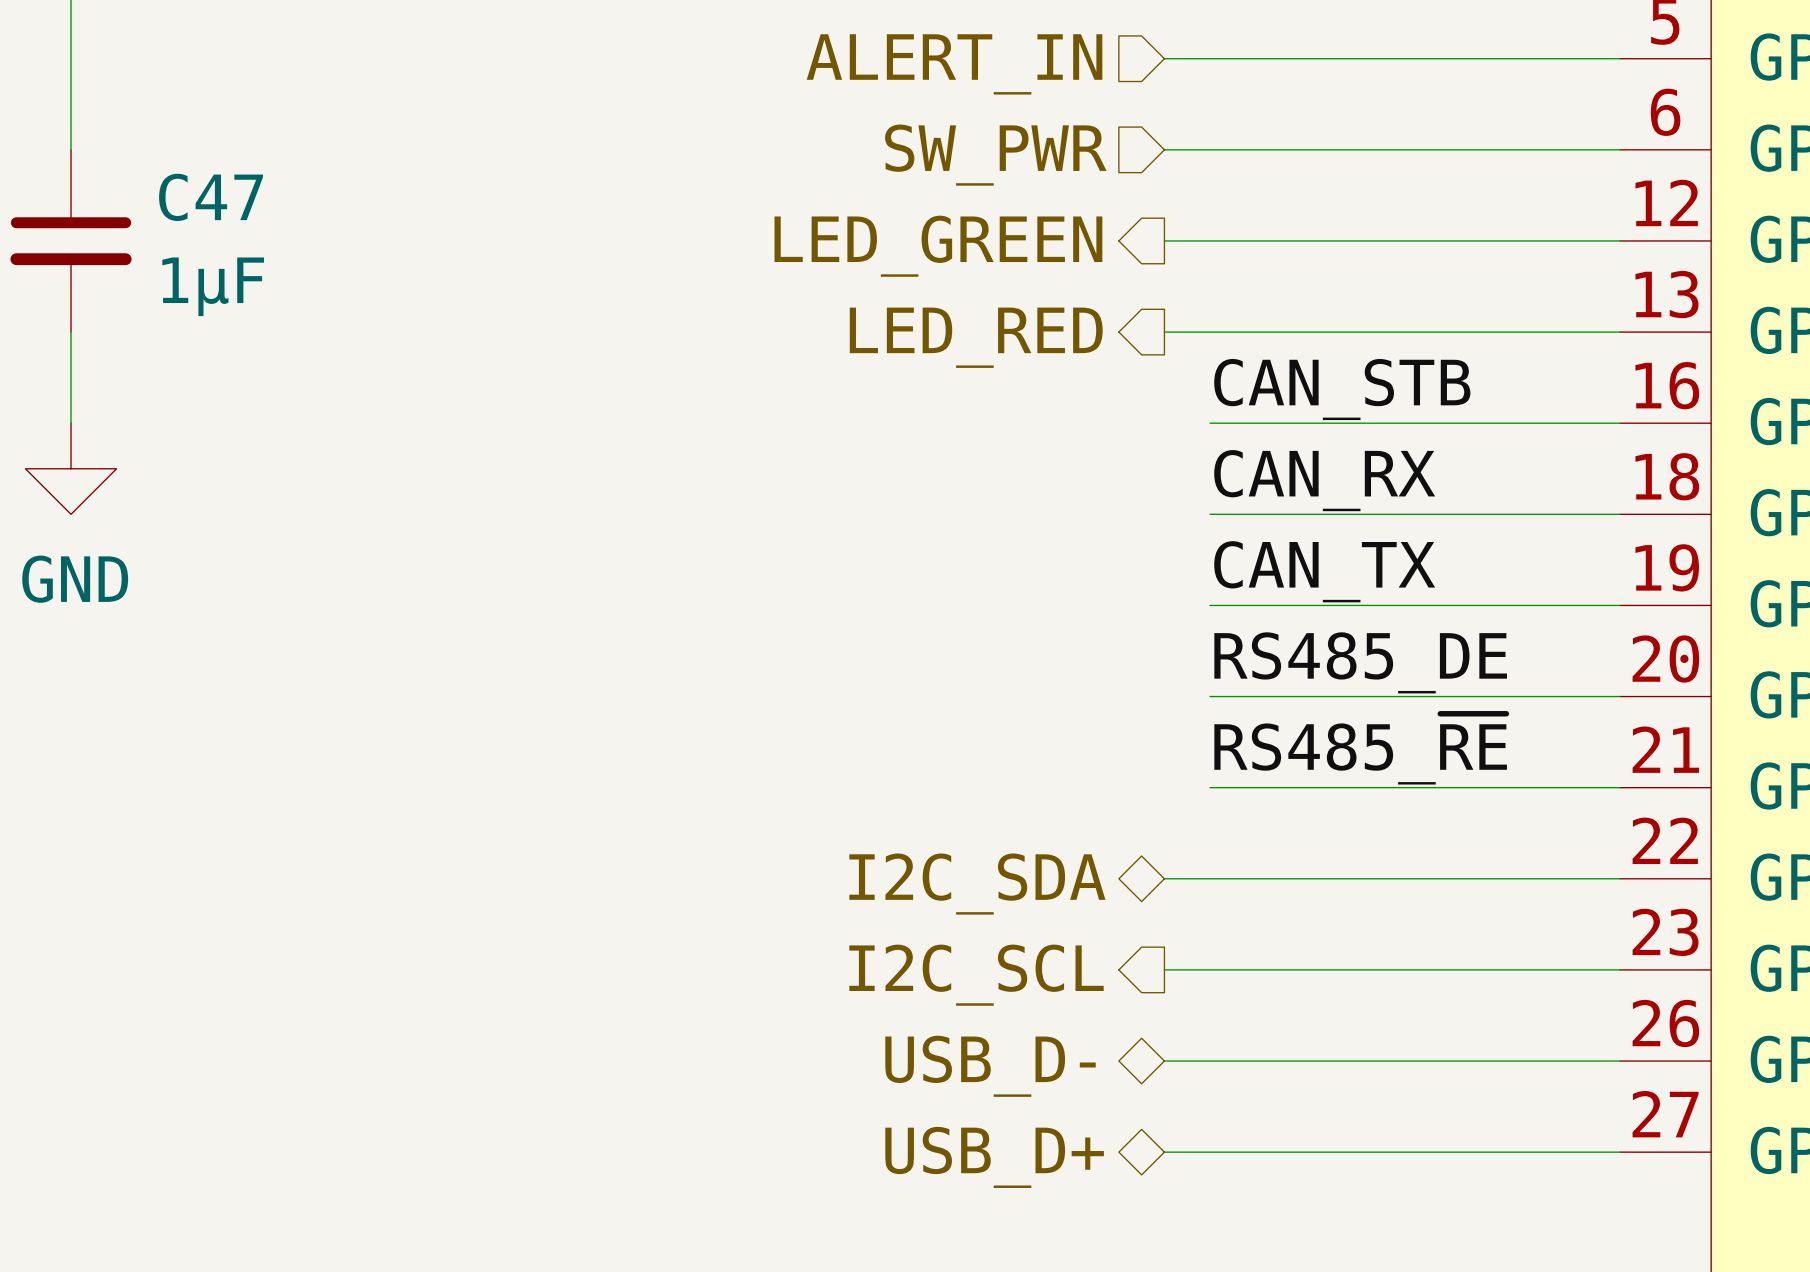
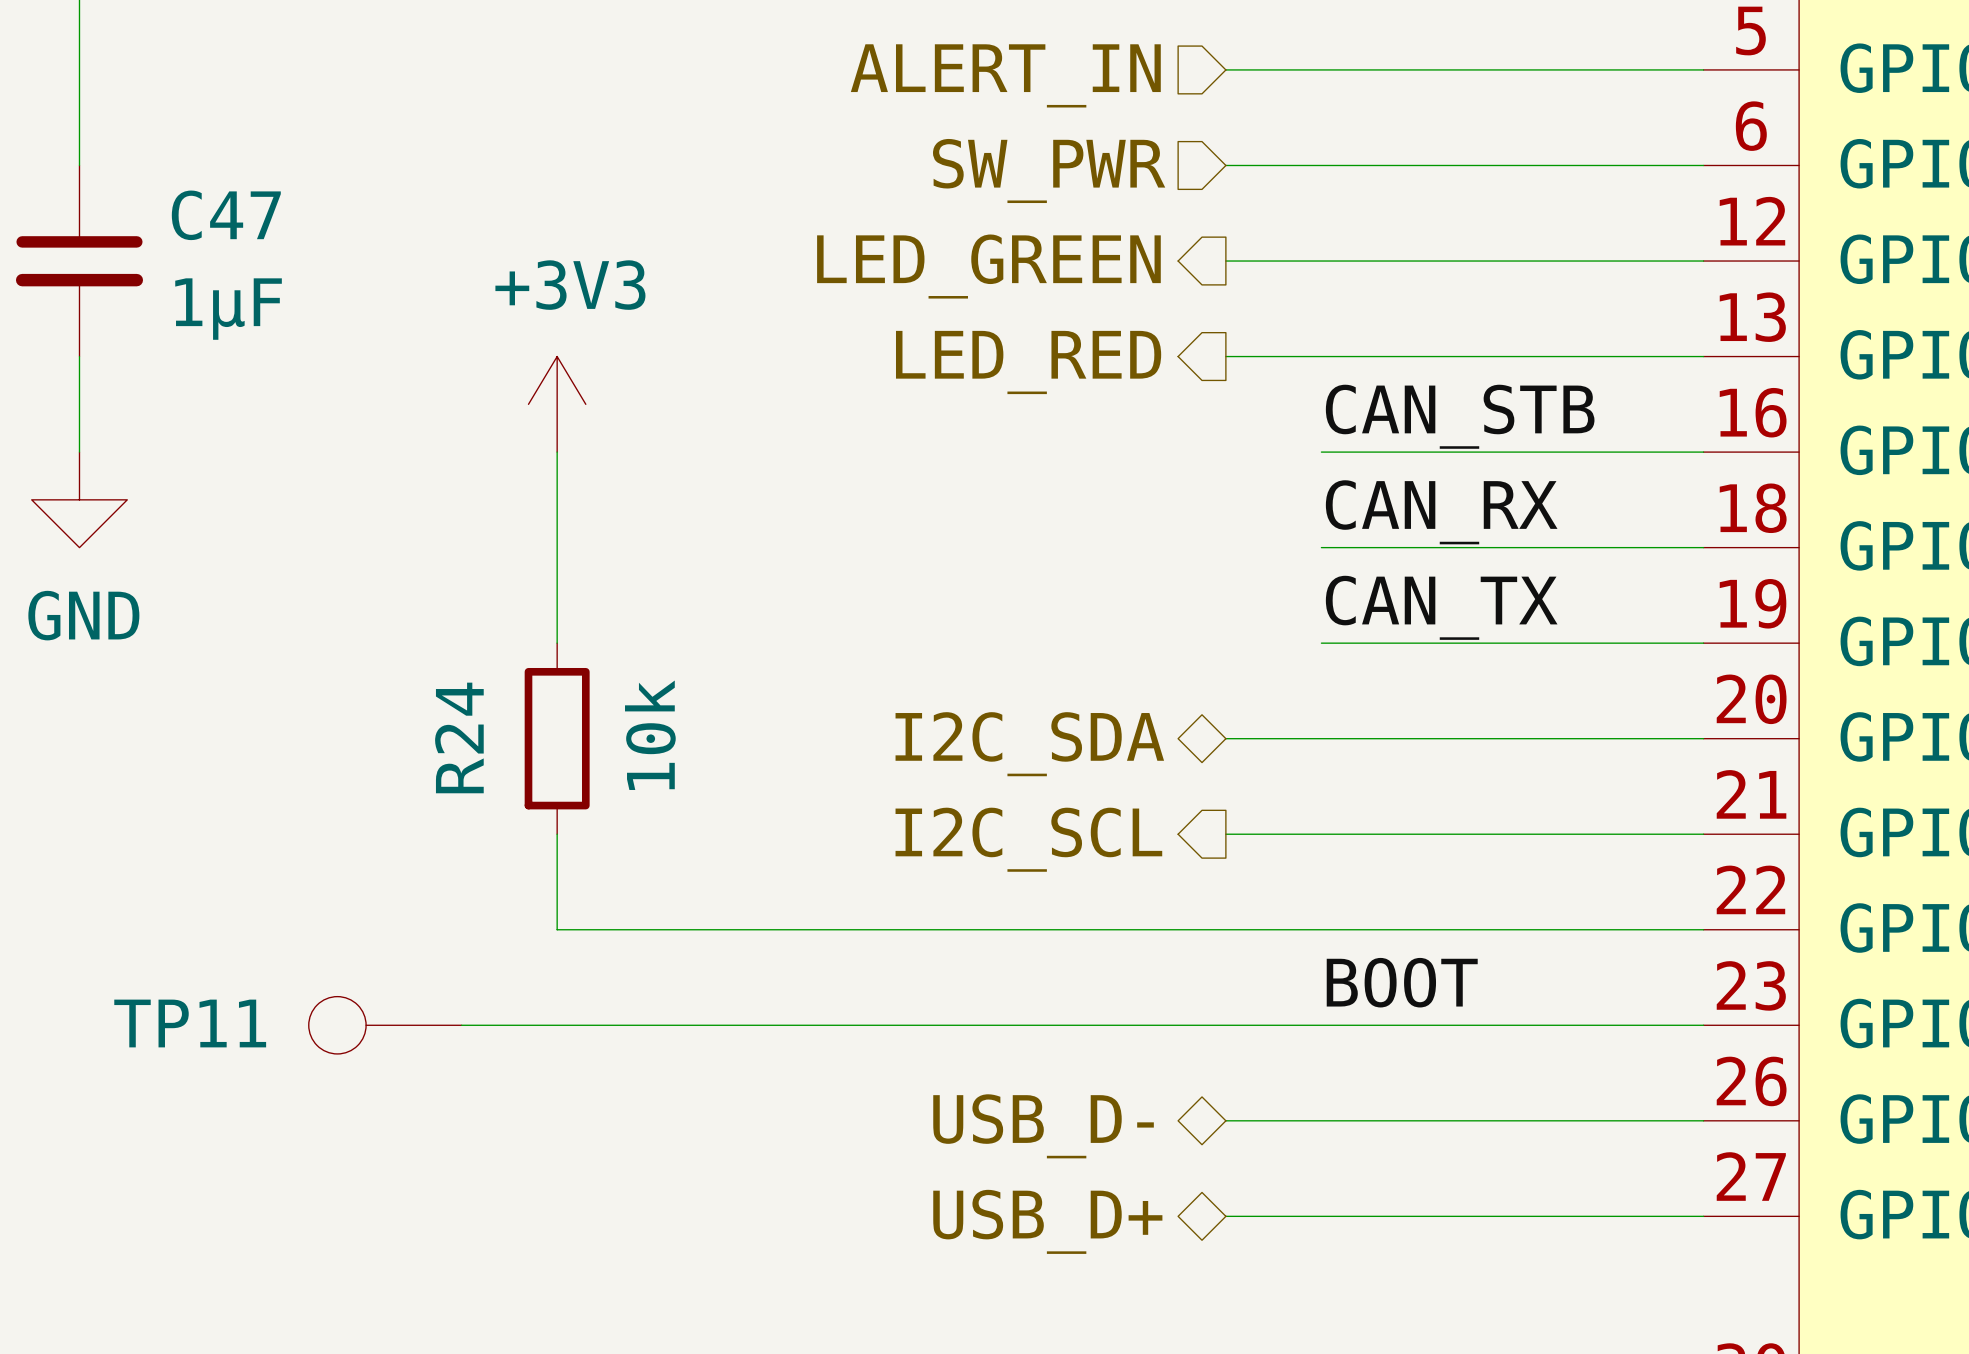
power symbol: none -> +3V3 (557, 404)
label position: CAN_STB (1342, 389) -> CAN_STB (1460, 416)
wire: none -> (557, 452) (557, 643)
wire: (1209, 423) (1255, 423) -> none
label position: CAN_RX (1324, 480) -> CAN_RX (1441, 512)
wire: (1209, 514) (1255, 514) -> (1225, 738) (1273, 738)
label position: CAN_TX (1324, 571) -> CAN_TX (1441, 607)
wire: (1209, 605) (1255, 605) -> (1225, 834) (1273, 834)
label: RS485_DE (1360, 662) -> none
R24: none -> 10k (557, 738)
label: RS485_~{RE} (1360, 749) -> none
wire: none -> (557, 834) (557, 929) (1225, 929)
hierarchical label position: I2C_SDA (977, 884) -> I2C_SDA (1029, 744)
label: none -> BOOT (1402, 982)
TP11: none -> (385, 1025)
wire: none -> (461, 1025) (1225, 1025)
hierarchical label position: I2C_SCL (976, 975) -> I2C_SCL (1028, 839)

